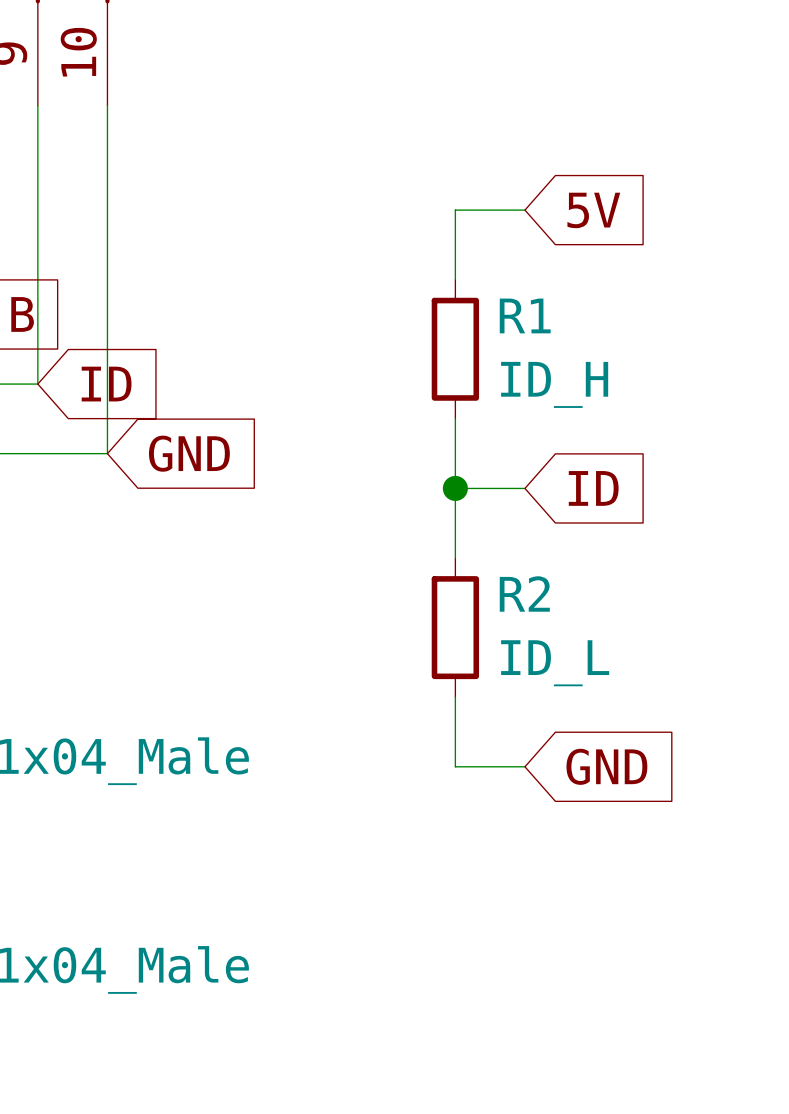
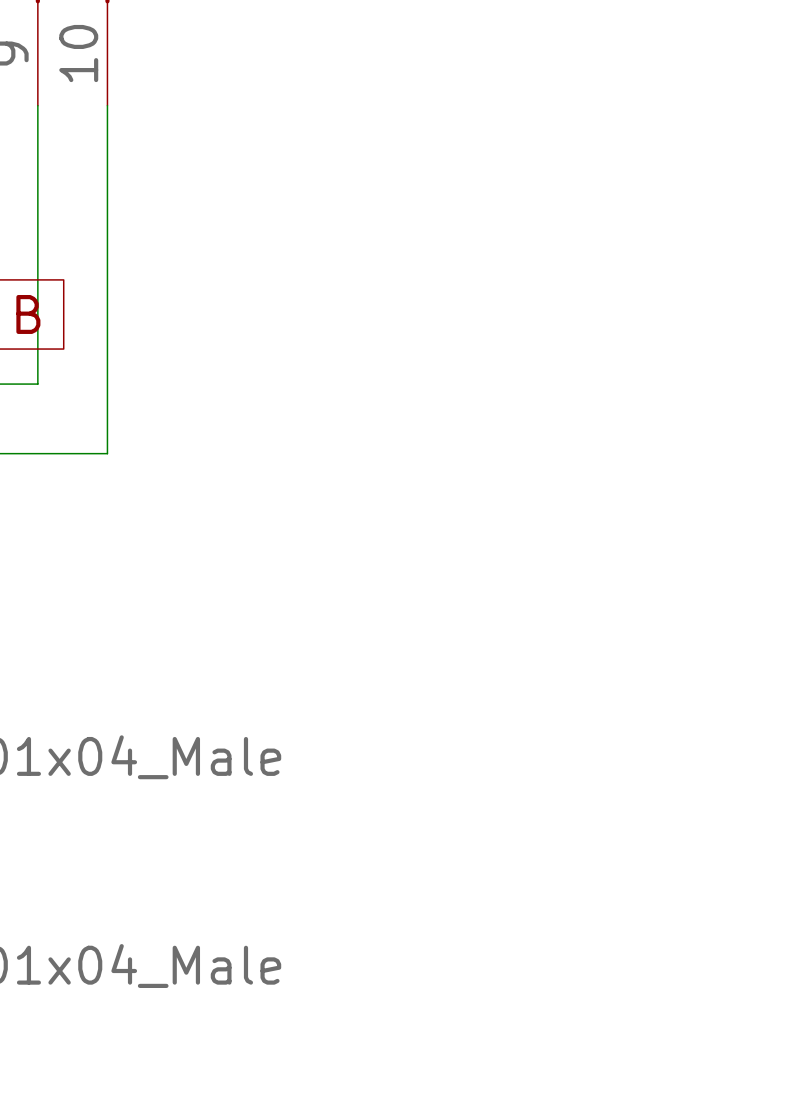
wire: (524, 210) (455, 210) (455, 279) -> none
global label: 5V (593, 210) -> none
R1: ID_H (455, 349) -> none
global label: ID (106, 384) -> none
wire: (455, 418) (455, 558) -> none
global label: GND (189, 453) -> none
wire: (455, 488) (524, 488) -> none
junction: (455, 488) -> none
global label: ID (593, 488) -> none
R2: ID_L (455, 627) -> none
wire: (455, 697) (455, 766) (524, 766) -> none
global label: GND (606, 766) -> none

